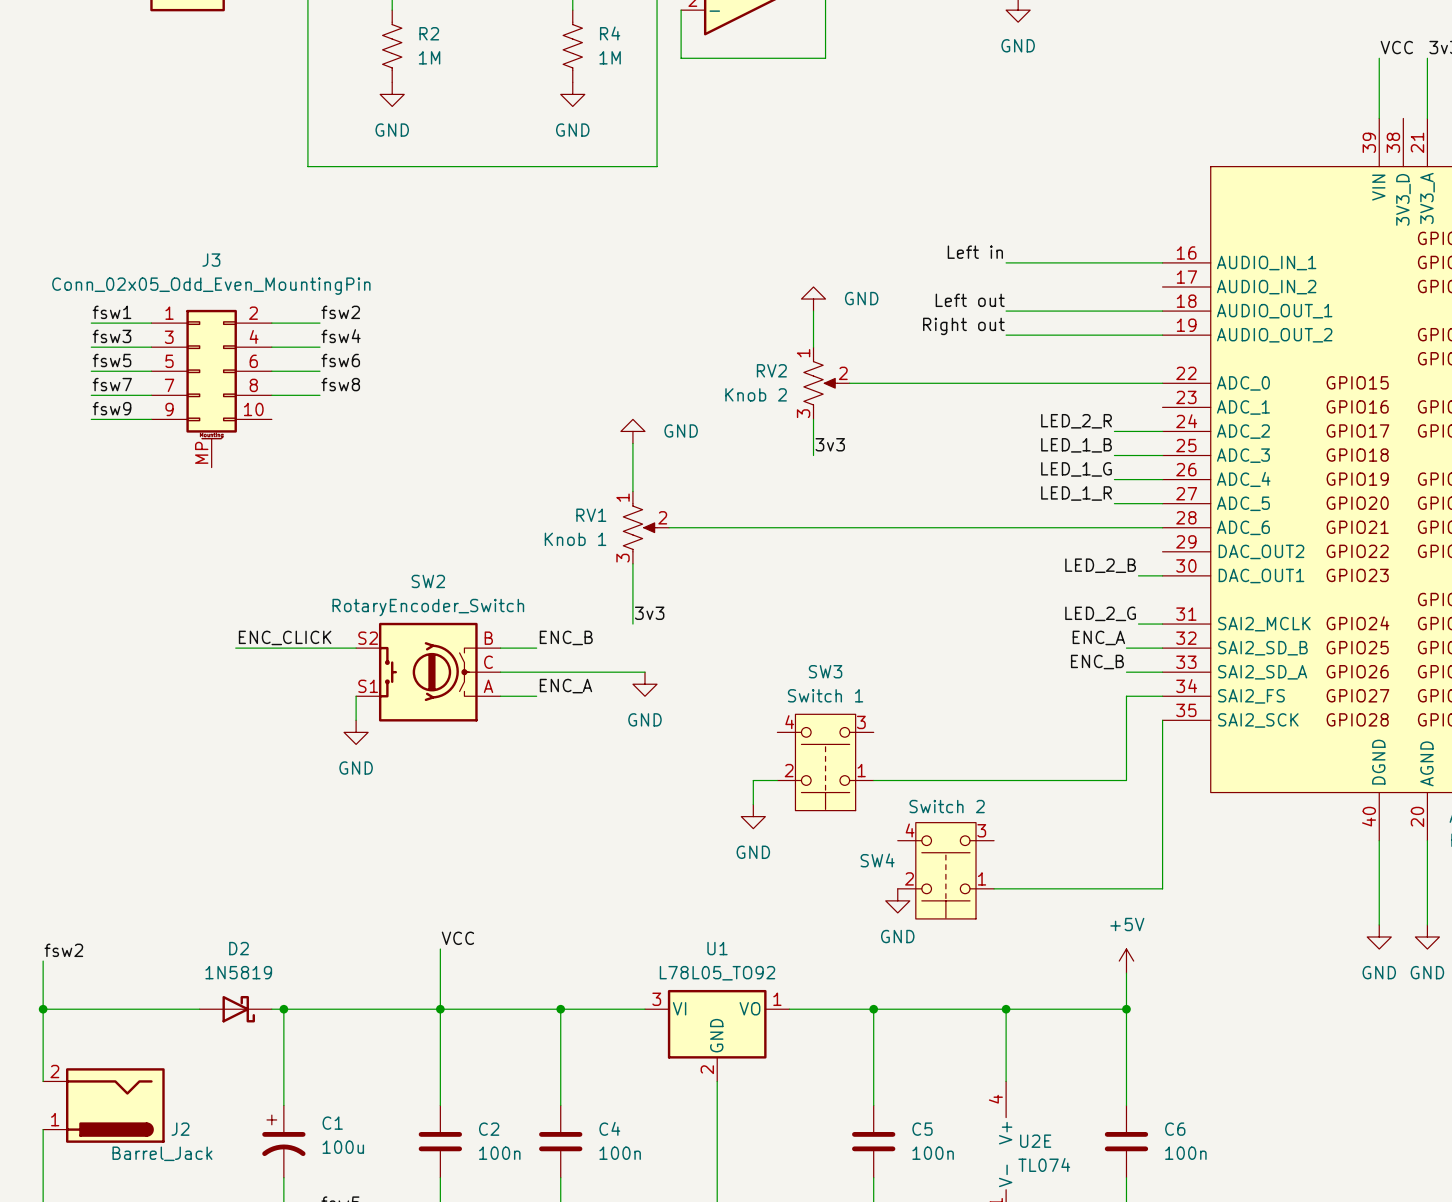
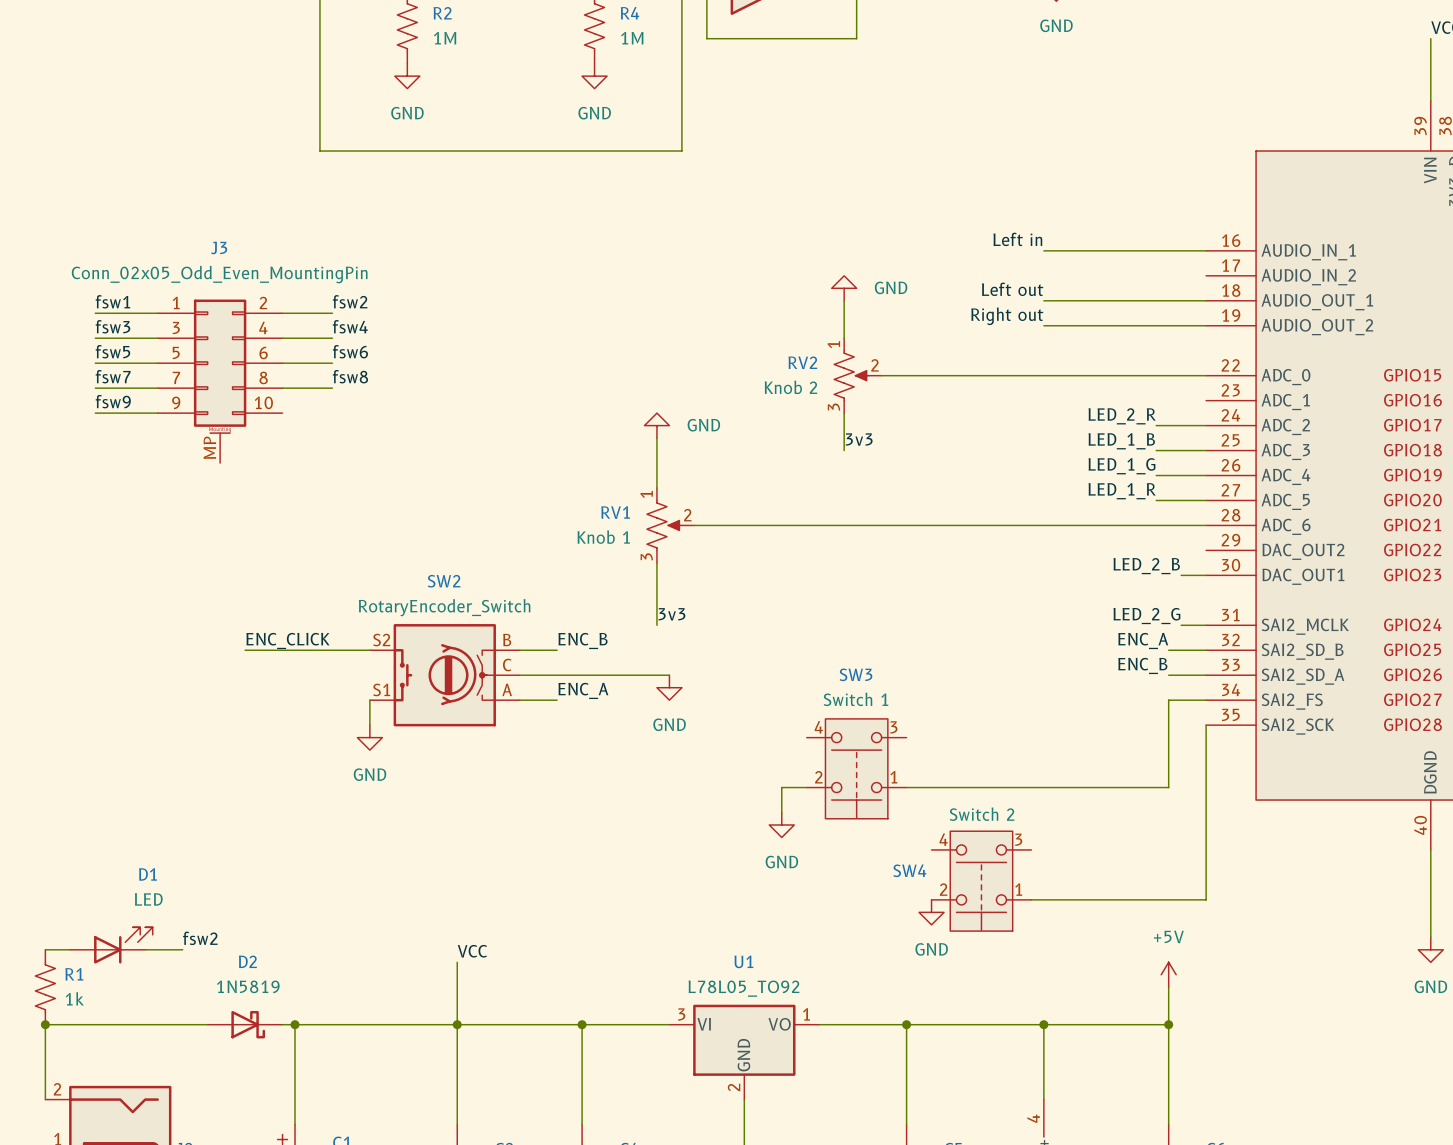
D1: none -> LED (111, 945)
wire: none -> (45, 949) (70, 949)
wire: none -> (145, 949) (182, 949)
label position: fsw2 (63, 950) -> fsw2 (200, 938)
wire: (43, 961) (43, 1009) -> none
R1: none -> 1k (45, 987)

